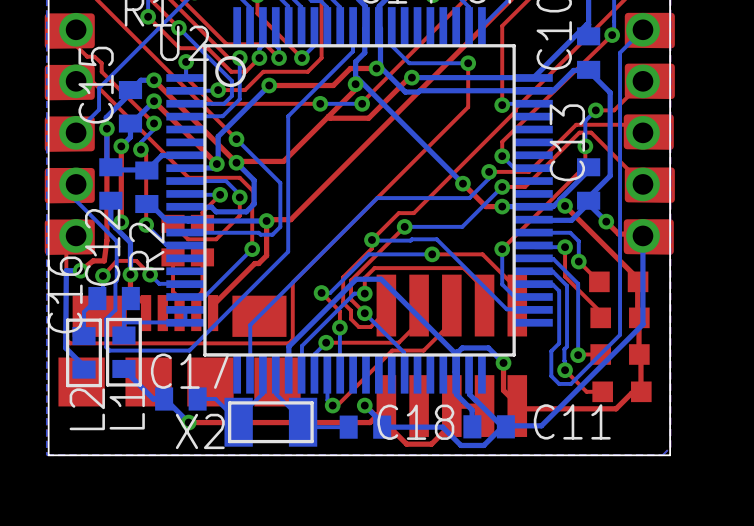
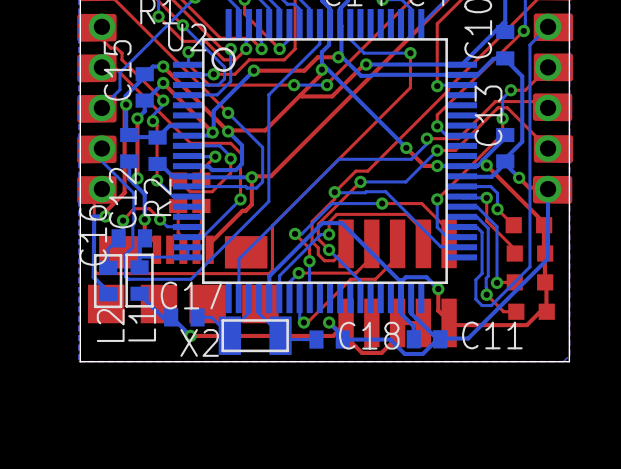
top track: (106, 128) (106, 240) (104, 260) (93, 260) (80, 270) -> none
top track: none -> (124, 109) (124, 192) (105, 211)

